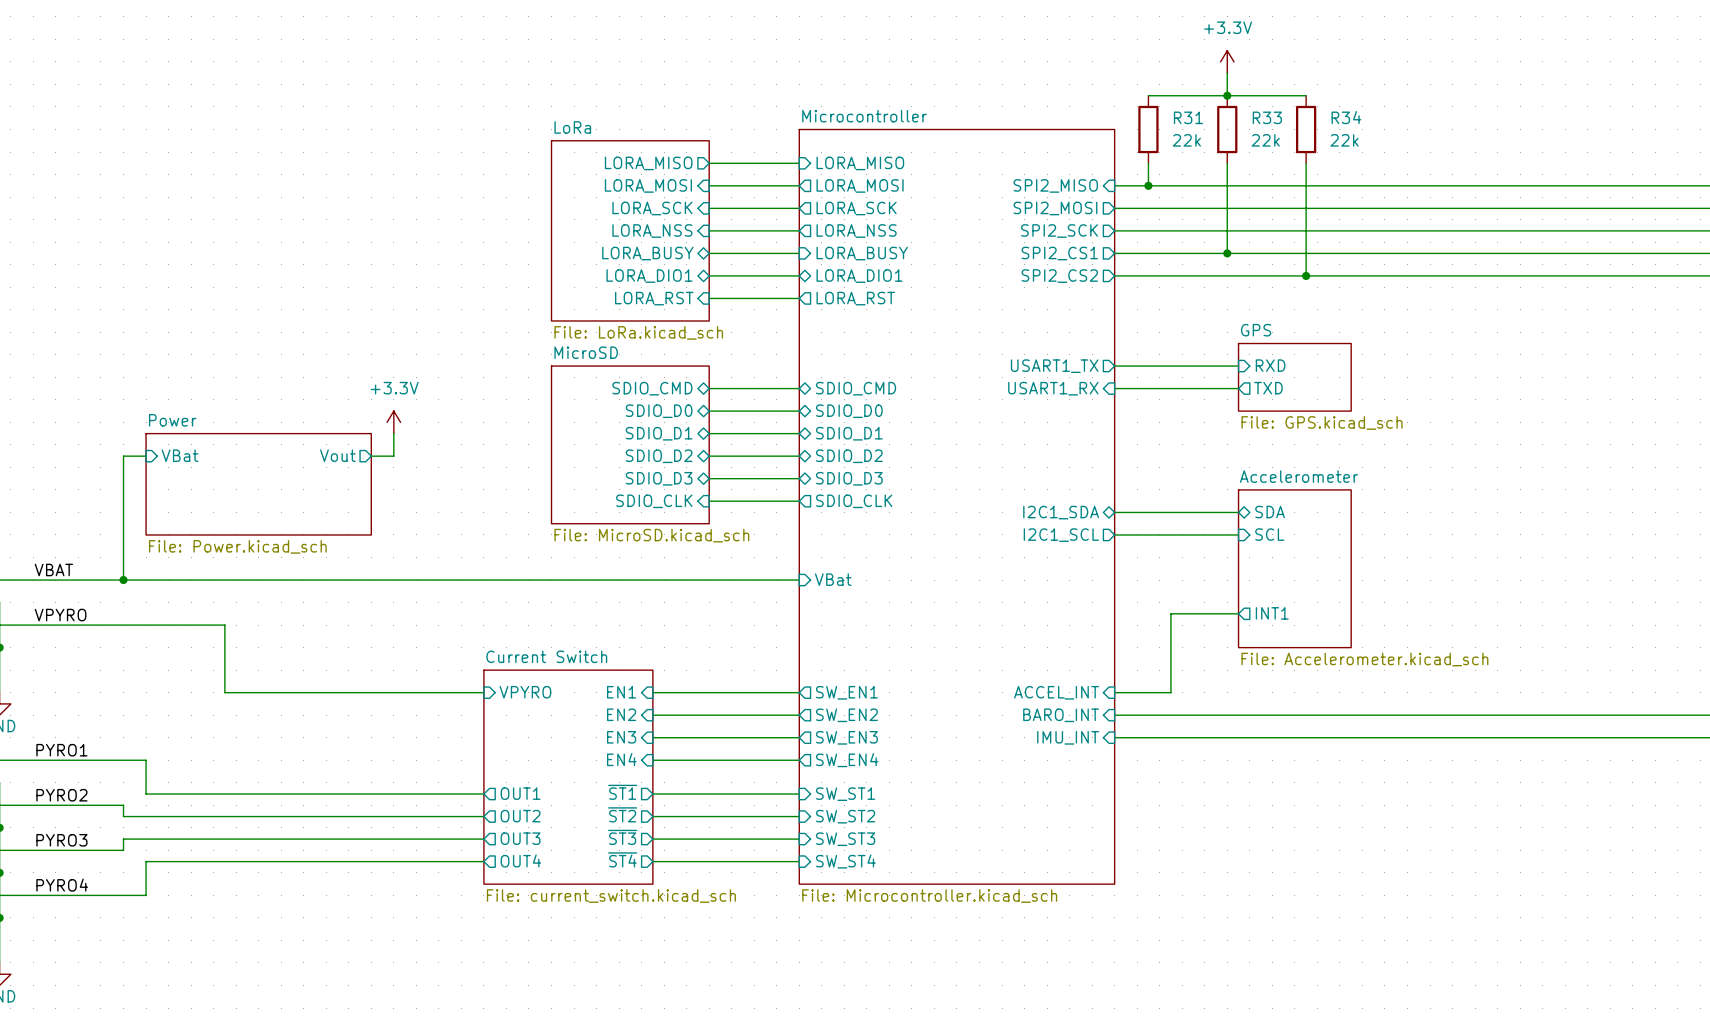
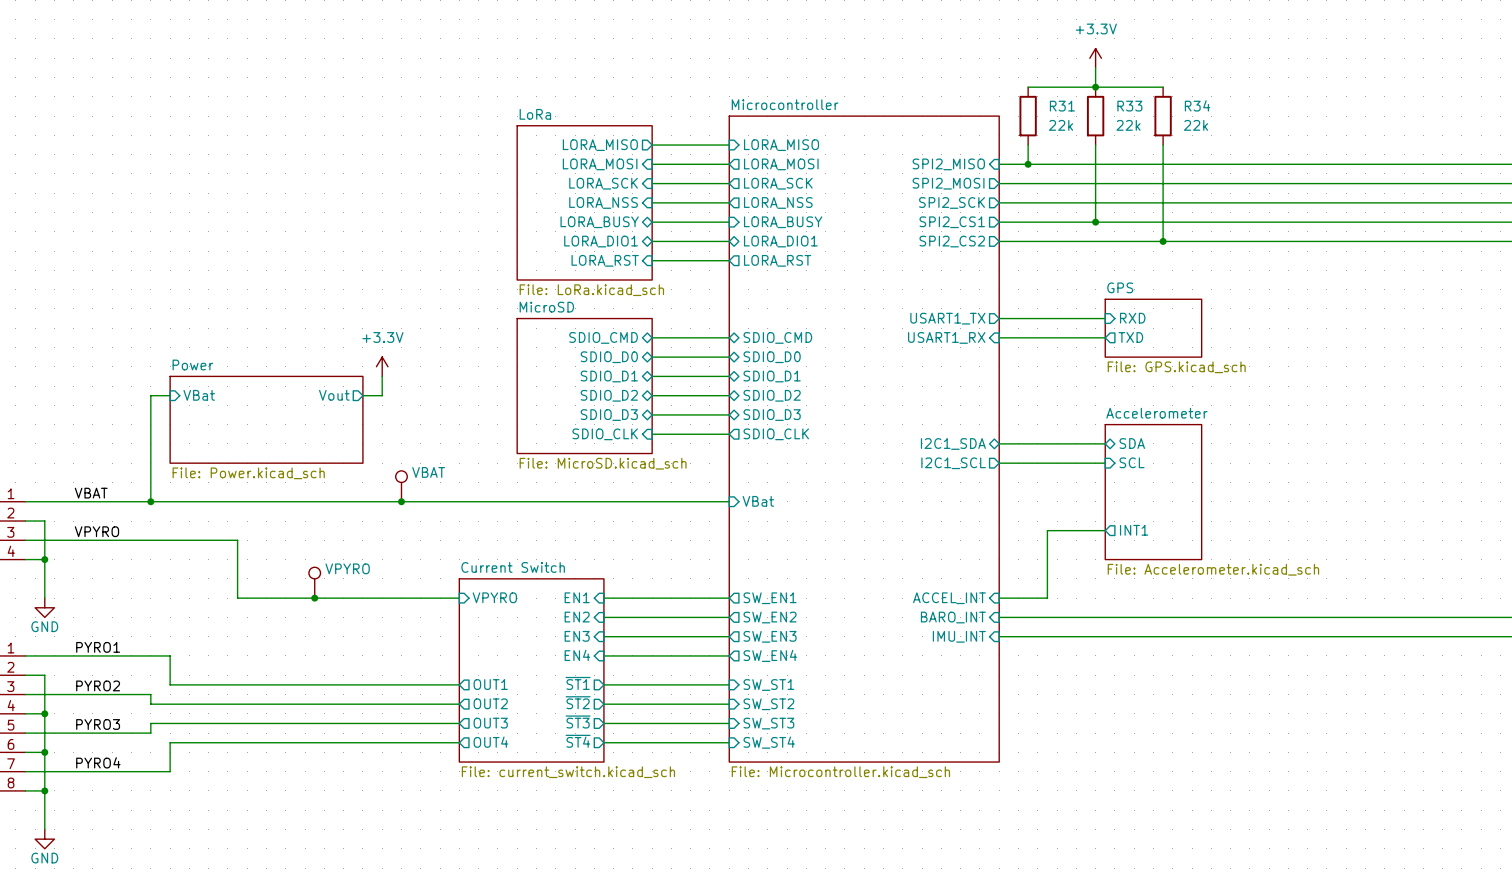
part: none -> VBAT (401, 486)
junction: none -> (401, 501)
part: none -> VPYRO (314, 582)
junction: none -> (314, 598)

